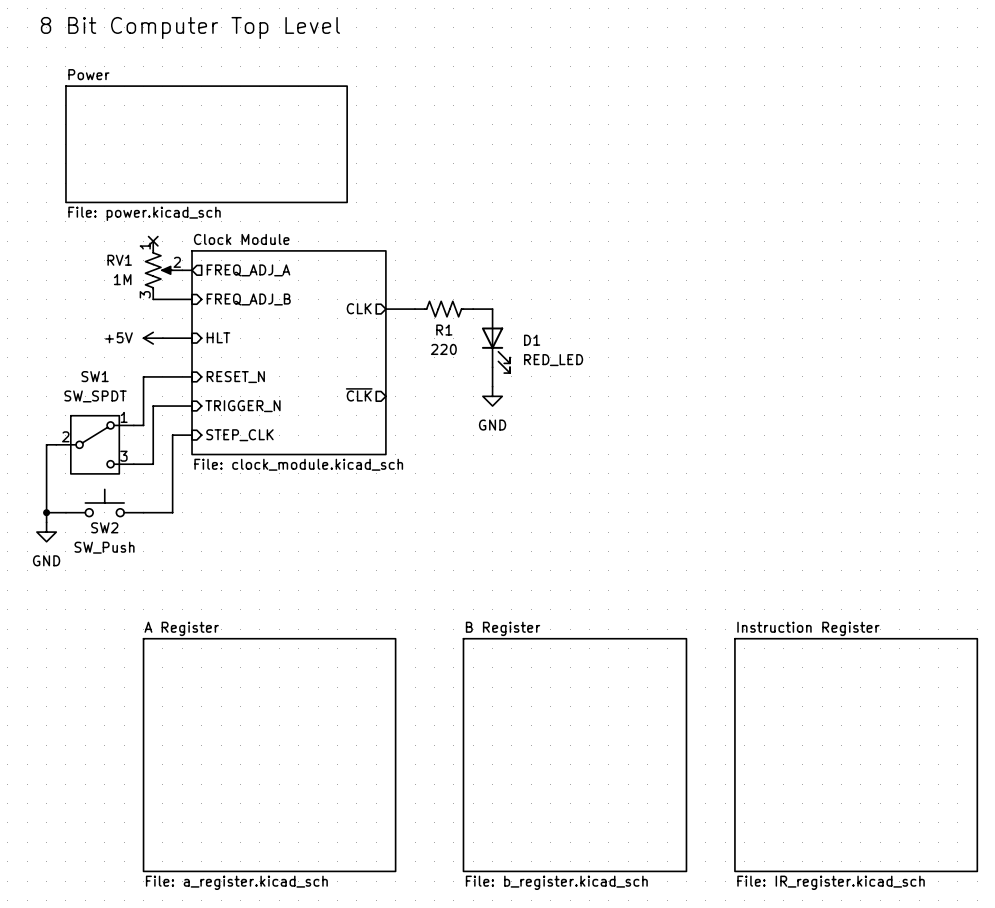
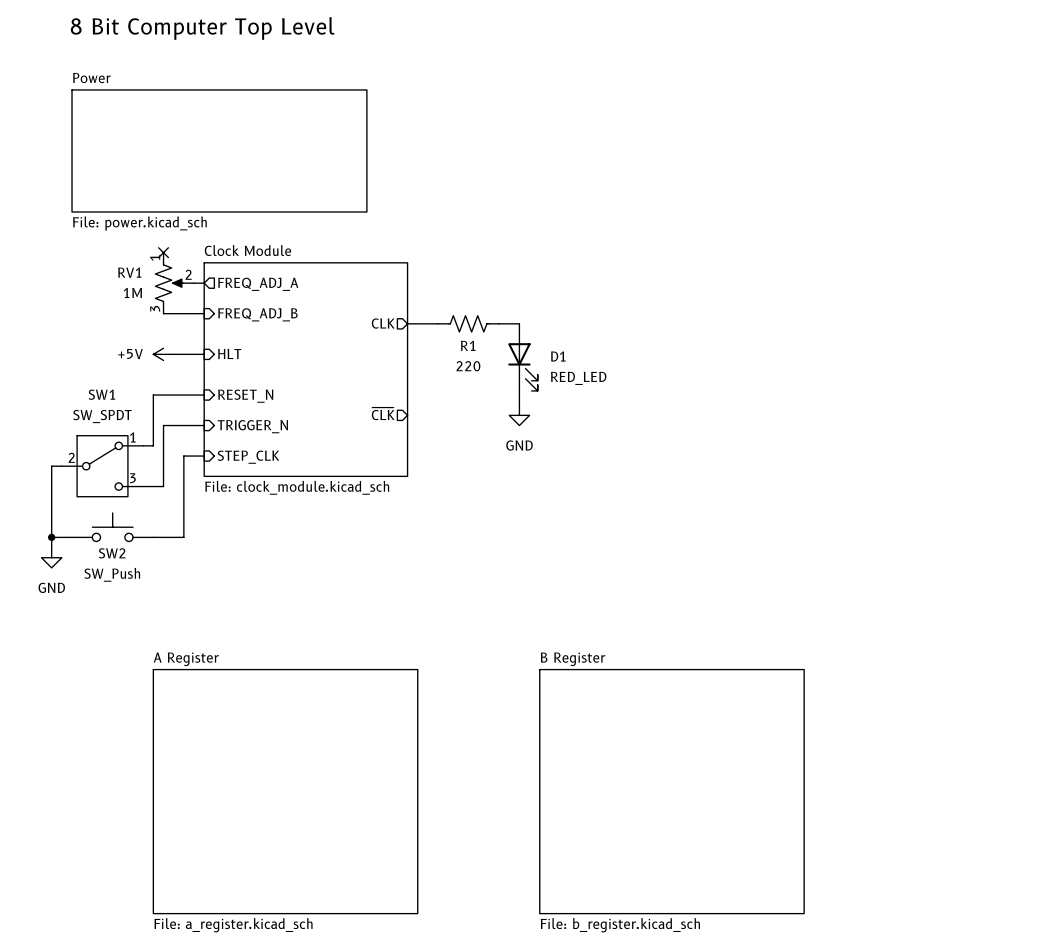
sheet B Register: File: b_register.kicad_sch (574, 755) -> none
sheet B Register: none -> File: b_register.kicad_sch (671, 791)
sheet Instruction Register: File: IR_register.kicad_sch (856, 755) -> none

